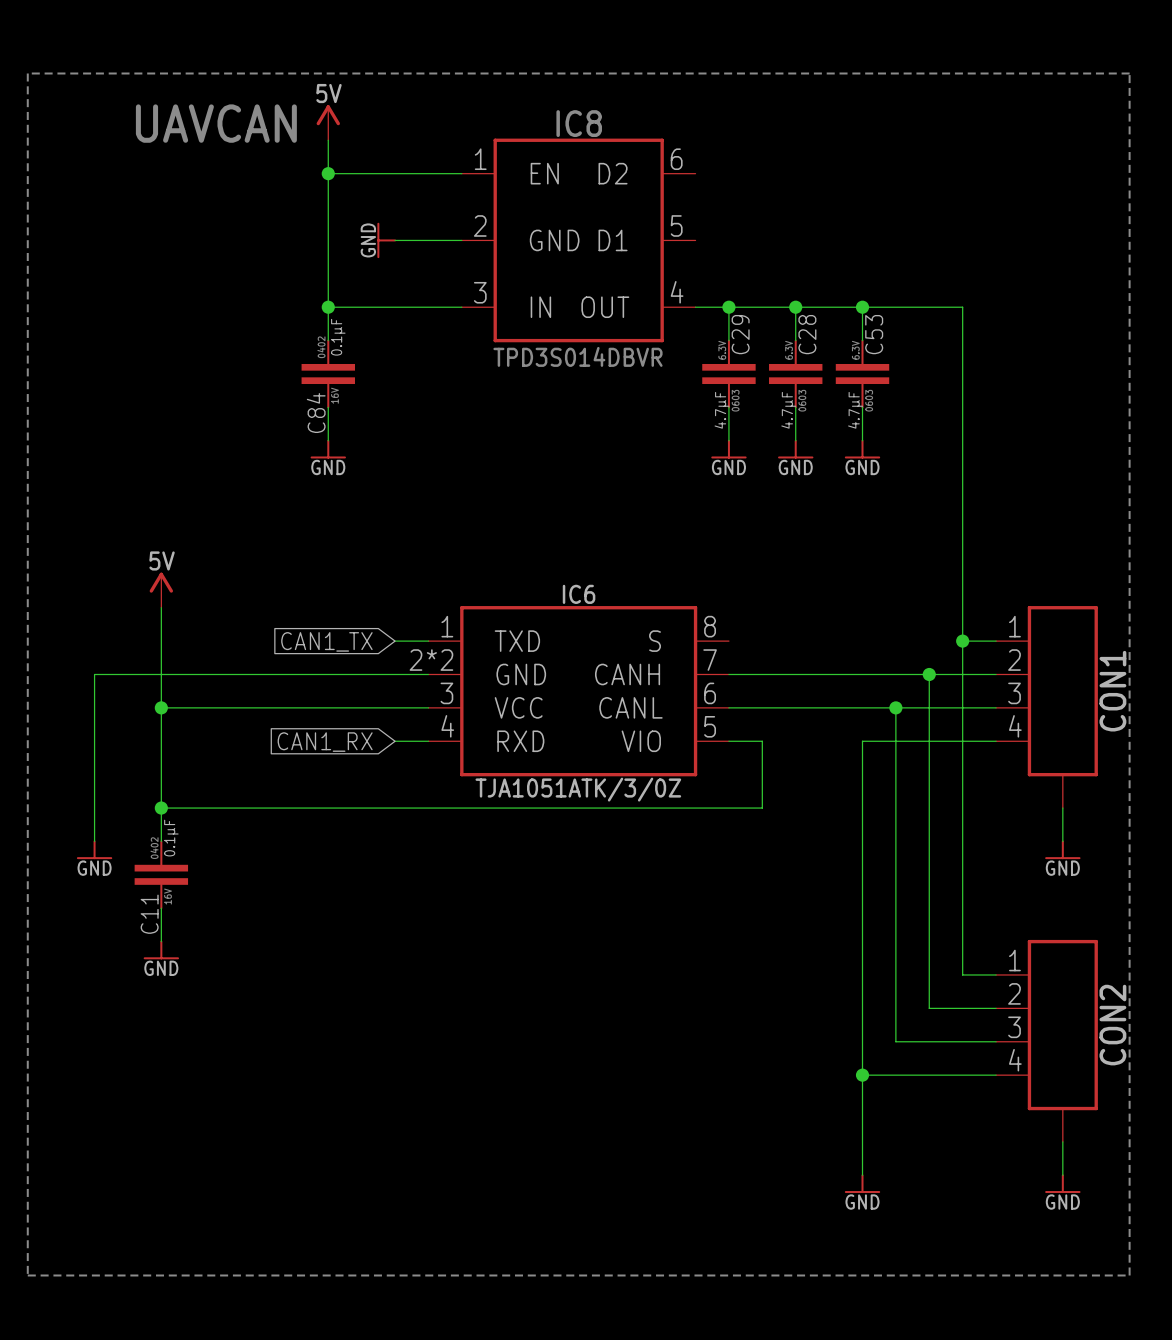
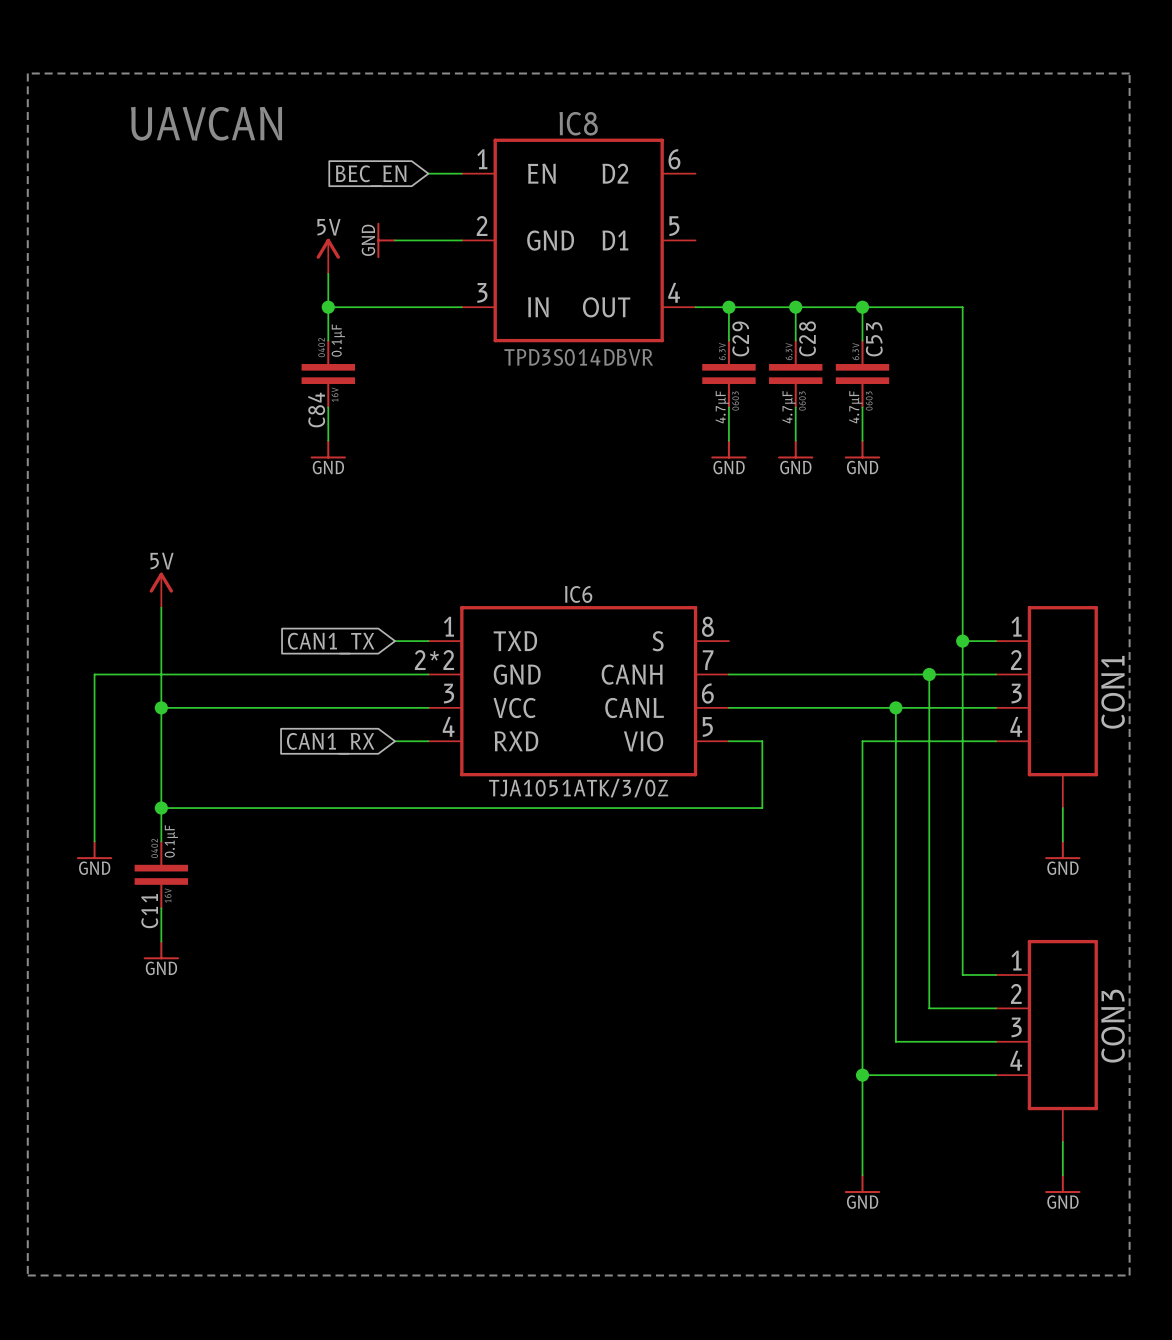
power symbol position: 5V (328, 122) -> 5V (328, 256)
wire: (328, 140) (328, 273) -> none
wire: (328, 173) (428, 173) -> none
junction: (328, 173) -> none
global label: none -> BEC_EN (371, 176)
CON2 name: CON2 (1112, 1025) -> CON3 (1113, 1026)

